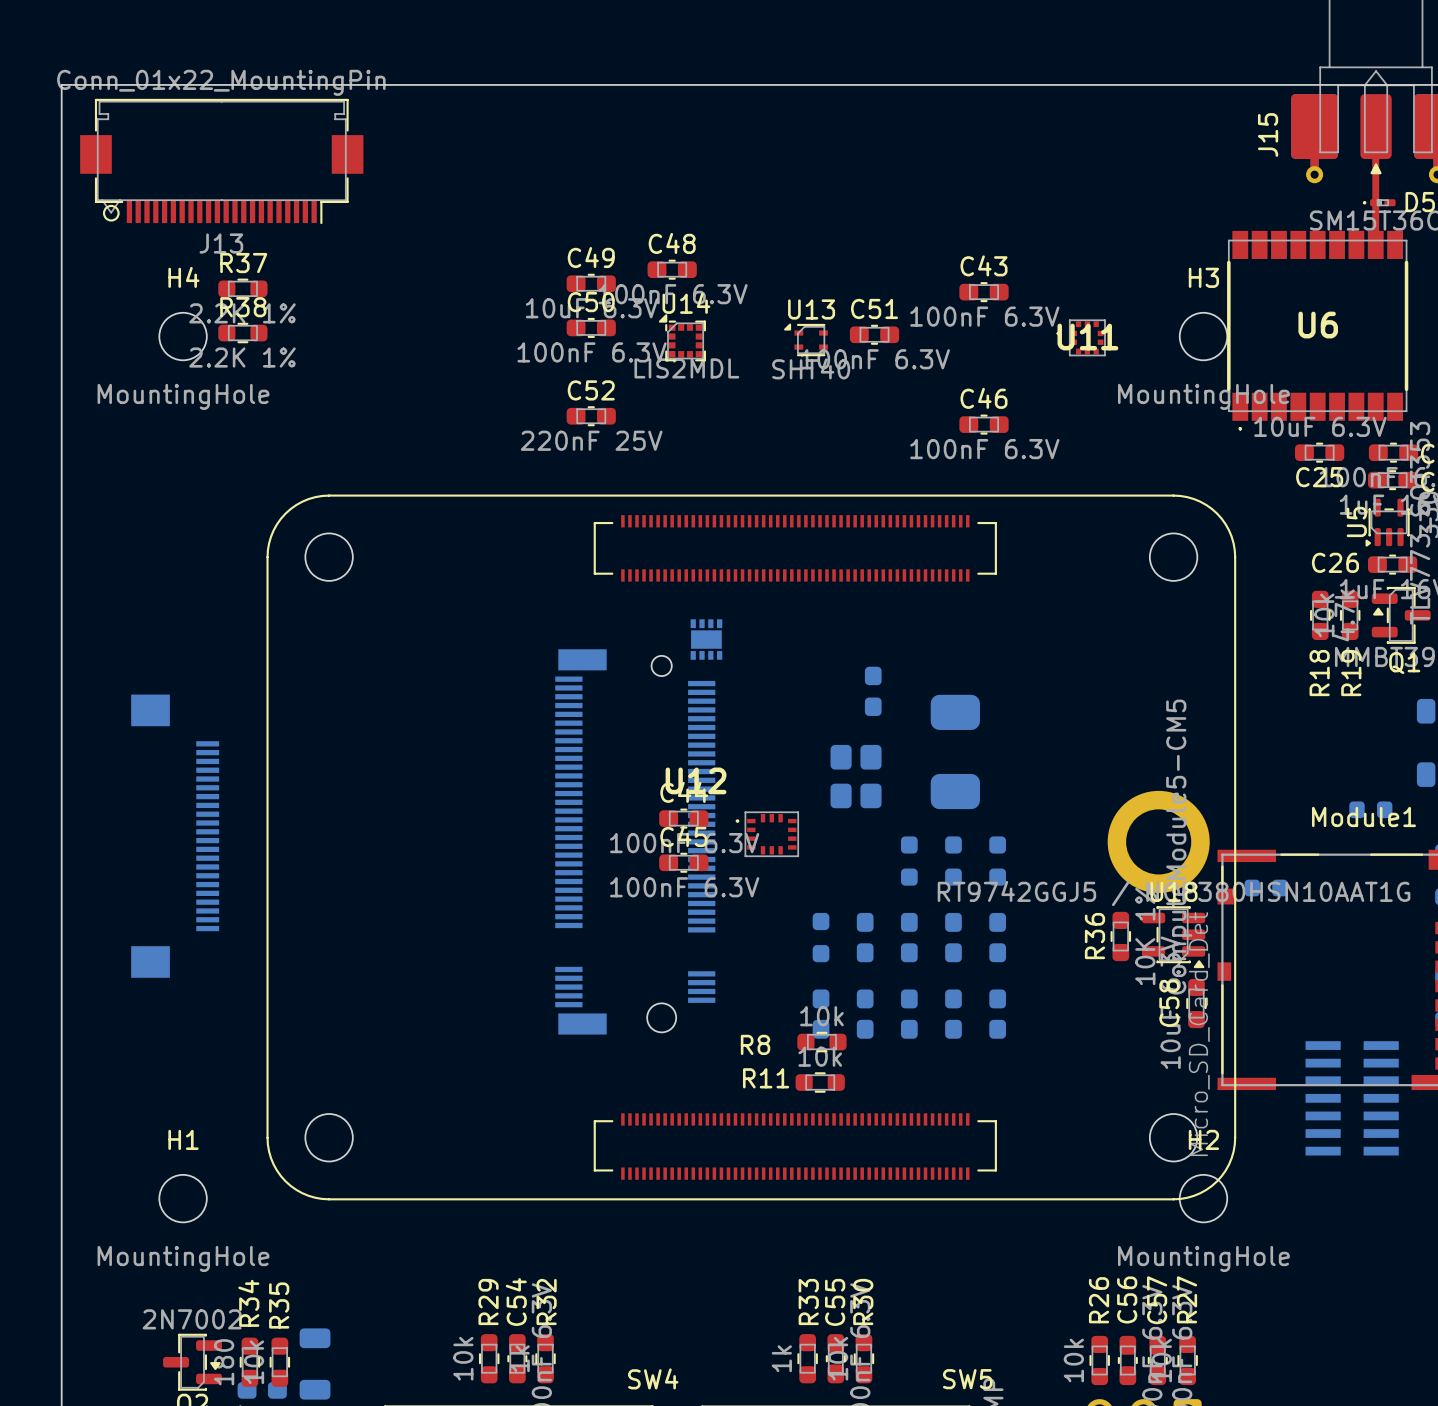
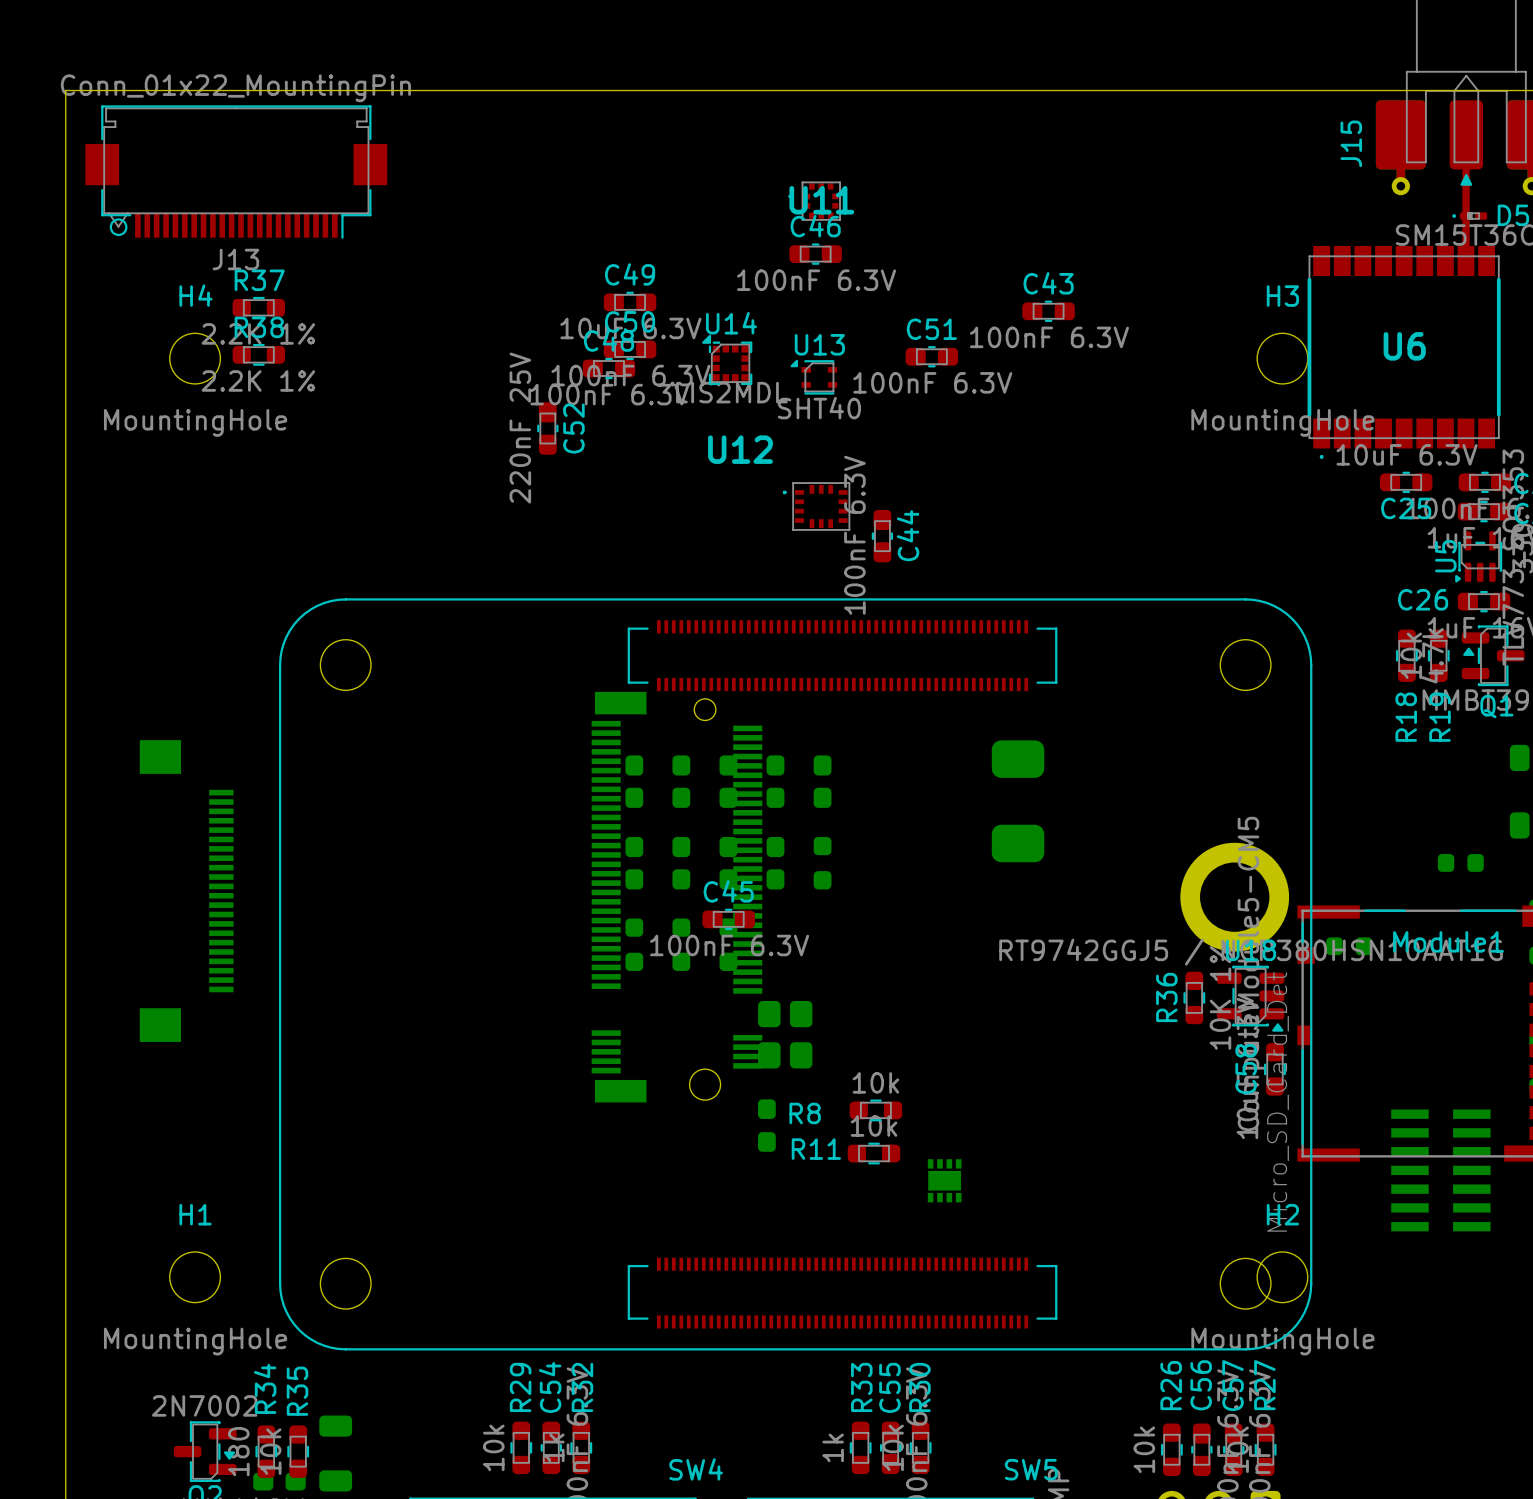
C48 position: (672, 269) -> (609, 368)
U11 position: (1081, 337) -> (814, 201)
U13 position: (805, 339) -> (813, 377)
C52 rotation: 0° (591, 416) -> 90° clockwise (547, 428)
C52 position: (591, 416) -> (547, 428)
C46 position: (984, 424) -> (815, 254)
part: (706, 639) -> none
part position: (873, 691) -> (766, 1125)
part: none -> (634, 781)
part: none -> (681, 781)
part: none -> (728, 781)
part: none -> (775, 781)
part: none -> (822, 781)
part position: (856, 776) -> (785, 1034)
part: none -> (634, 863)
part: none -> (681, 863)
part: none -> (728, 863)
part: none -> (775, 863)
part: none -> (822, 863)
C44 rotation: 0° (683, 818) -> 90° clockwise (882, 536)
C44 position: (683, 818) -> (882, 536)
U12 position: (767, 834) -> (816, 506)
Module1 position: (751, 847) -> (795, 974)
part: (909, 861) -> none
part: (953, 861) -> none
part: (997, 861) -> none
part: none -> (634, 944)
part: none -> (681, 944)
part: none -> (728, 944)
part: (821, 937) -> none
part: (865, 937) -> none
part: (909, 937) -> none
part: (953, 937) -> none
part: (997, 937) -> none
part: (821, 1014) -> none
part: (865, 1014) -> none
part: (909, 1014) -> none
part: (953, 1014) -> none
part: (997, 1014) -> none
part: none -> (944, 1180)

